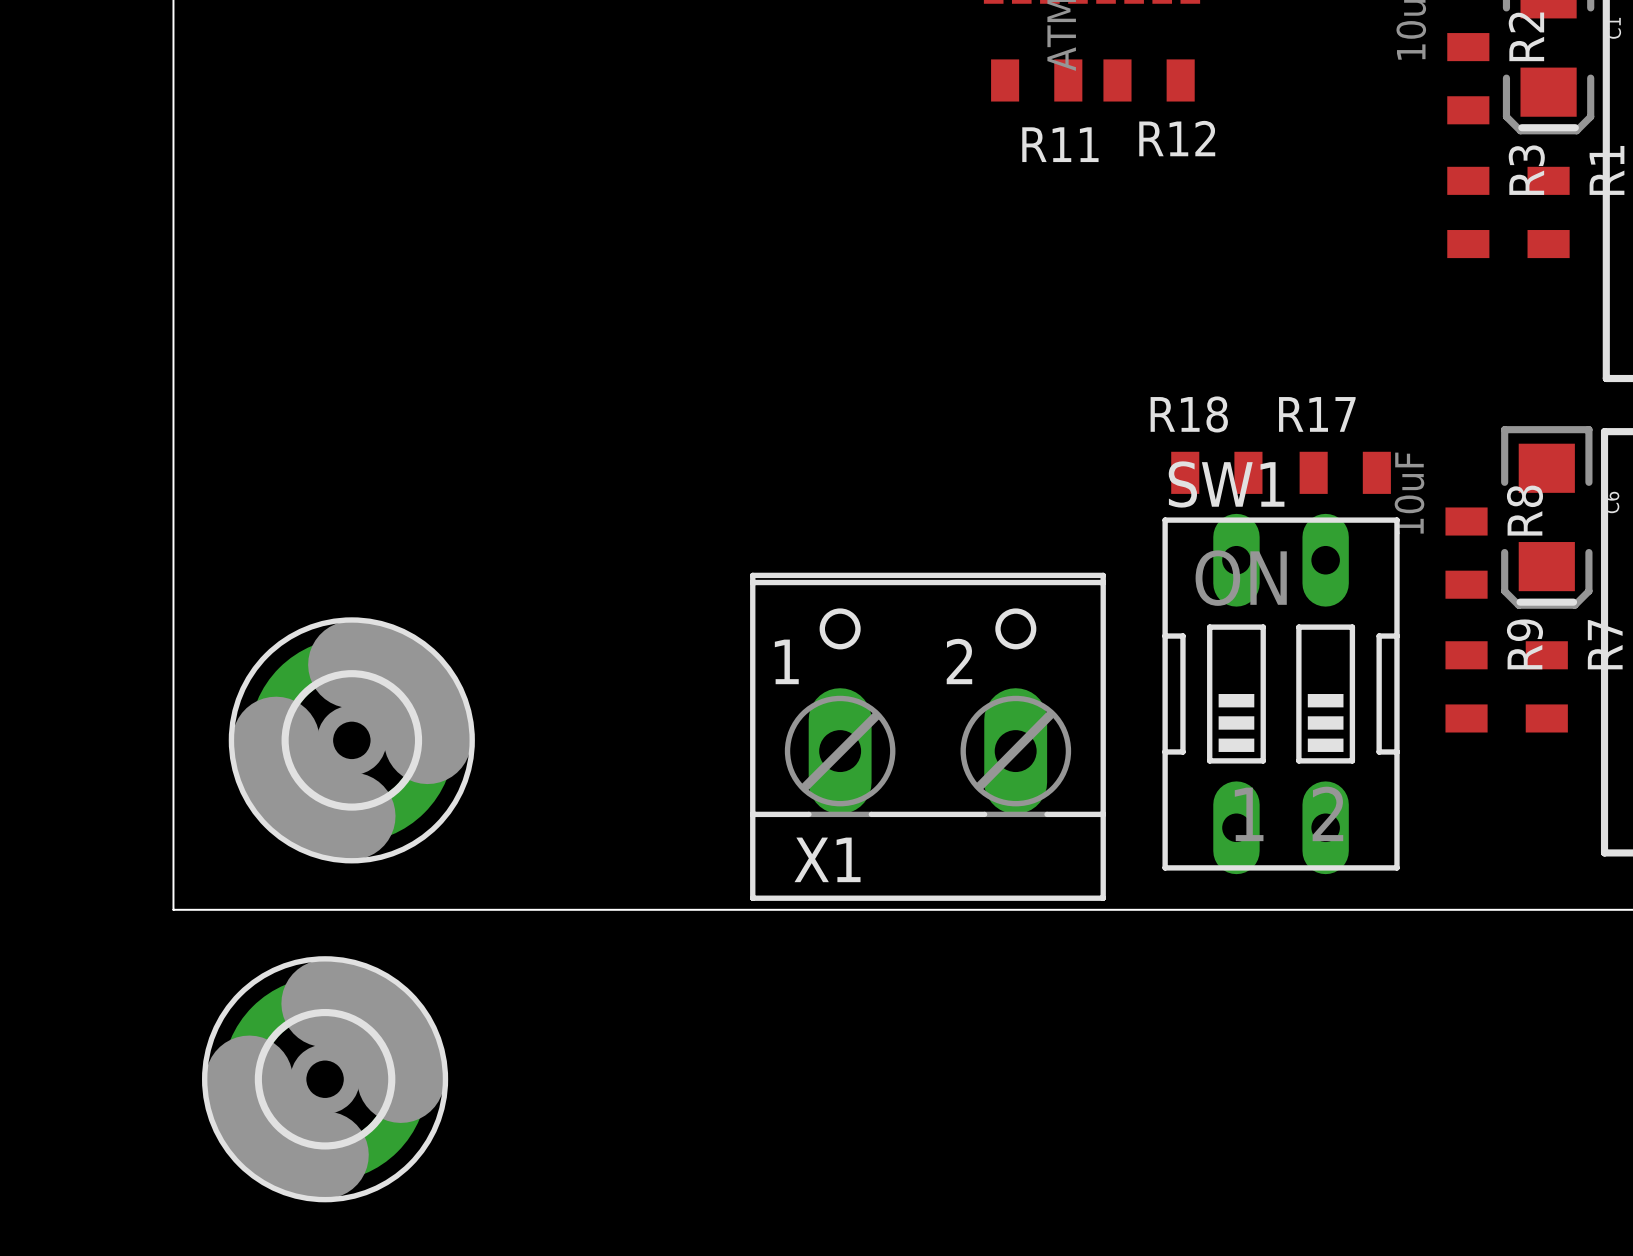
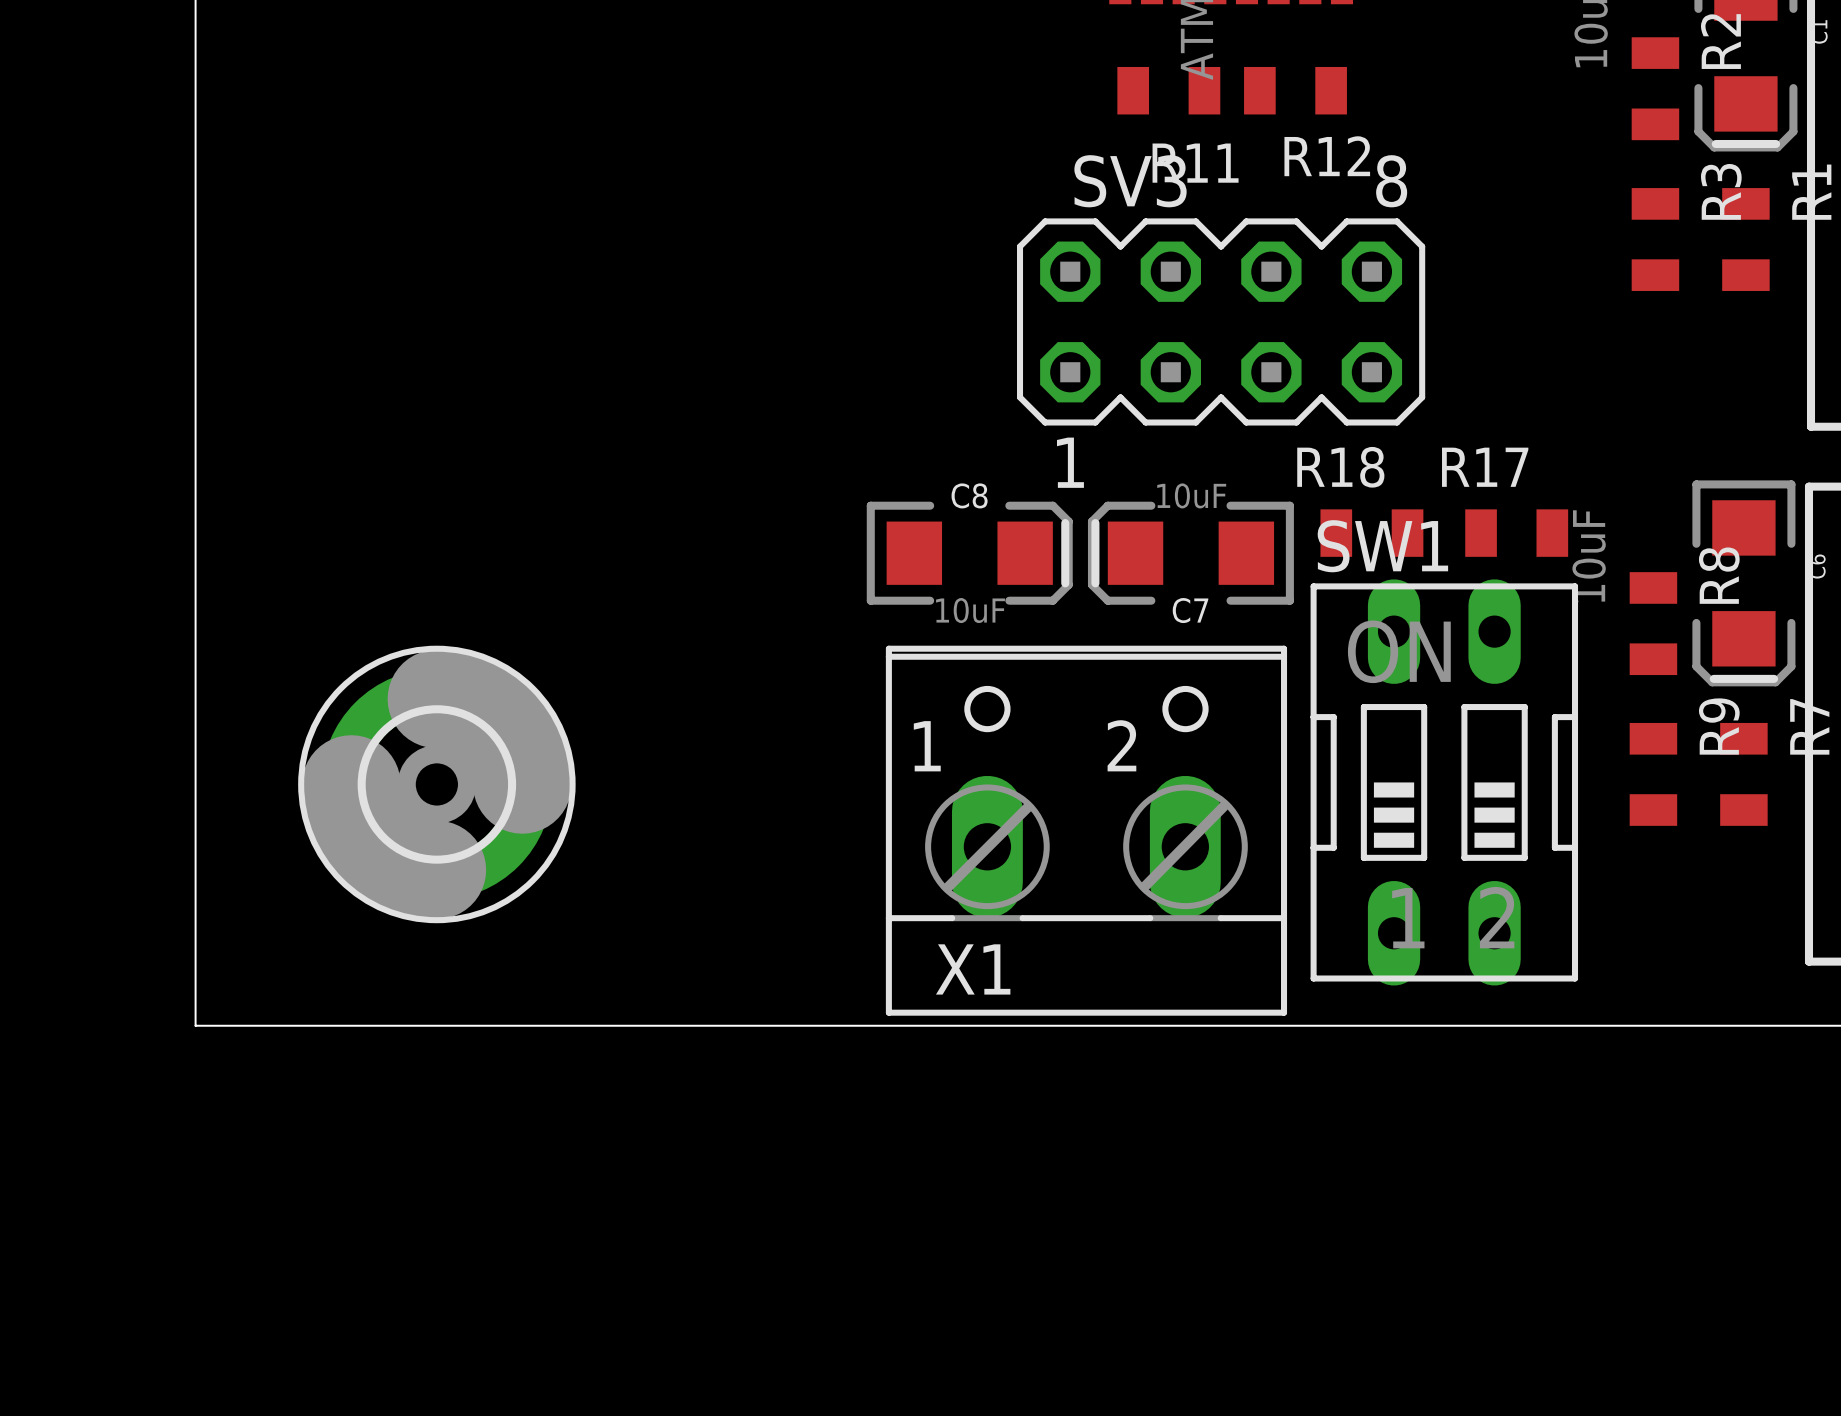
SV3: none -> (1221, 321)
C8: none -> 10uF (969, 553)
C7: none -> 10uF (1190, 553)
X1 position: (927, 736) -> (1086, 830)
part position: (351, 740) -> (436, 784)
part: (325, 1079) -> none

